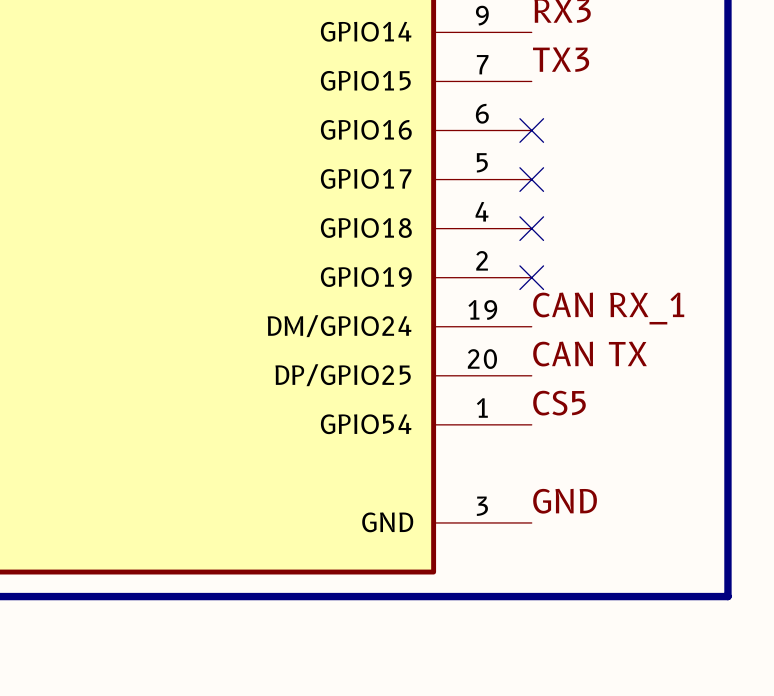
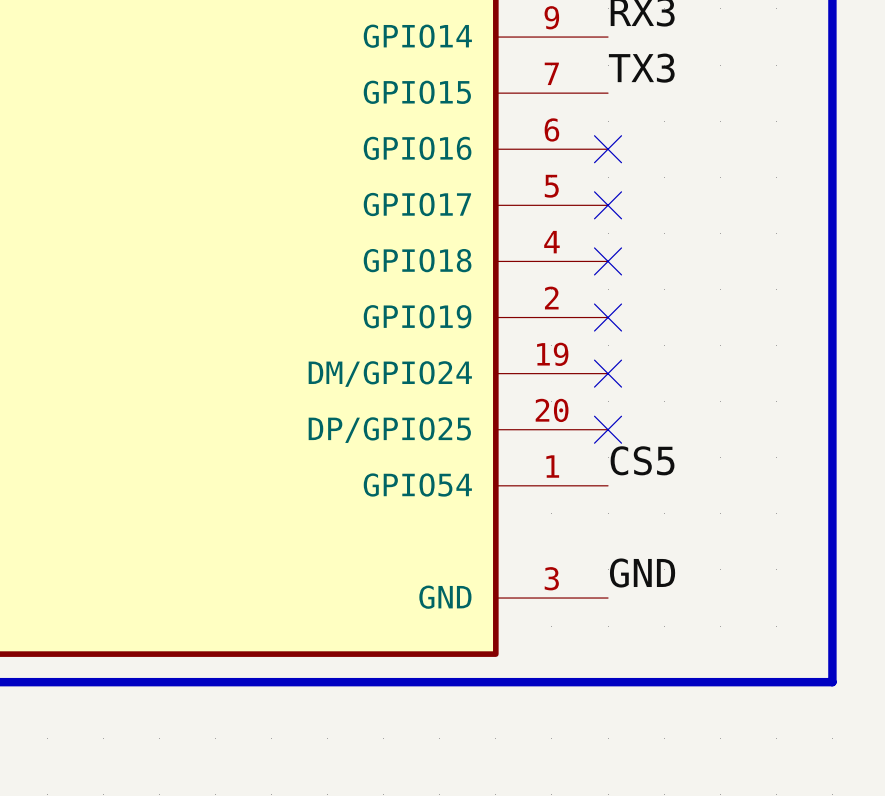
label: CAN RX_1 (608, 308) -> none
no-connect mark: none -> (608, 373)
label: CAN TX (590, 354) -> none
no-connect mark: none -> (608, 429)

